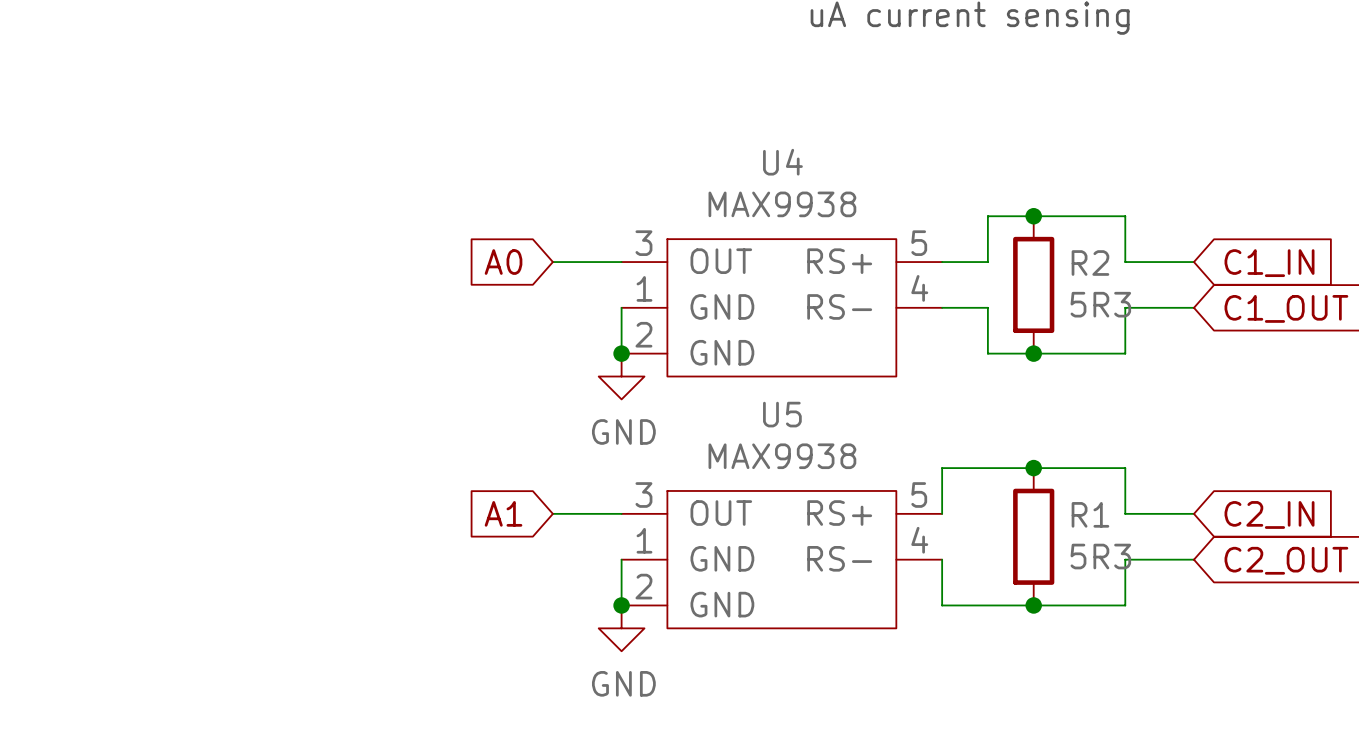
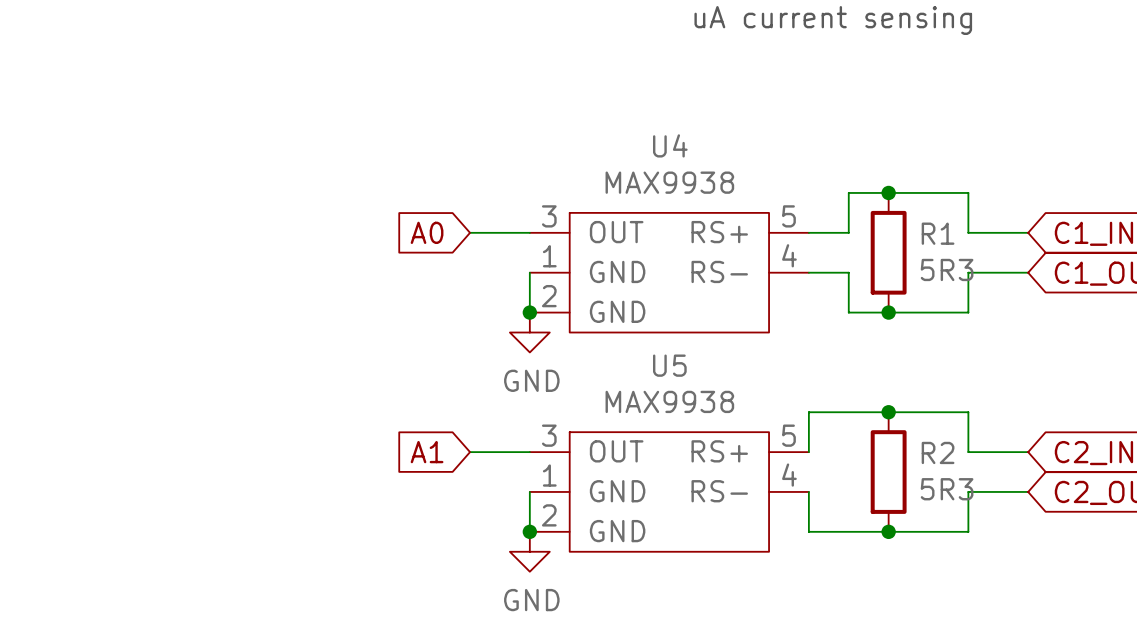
R2 name: R2 (1090, 263) -> R1 (938, 233)
R1 name: R1 (1090, 514) -> R2 (938, 452)

